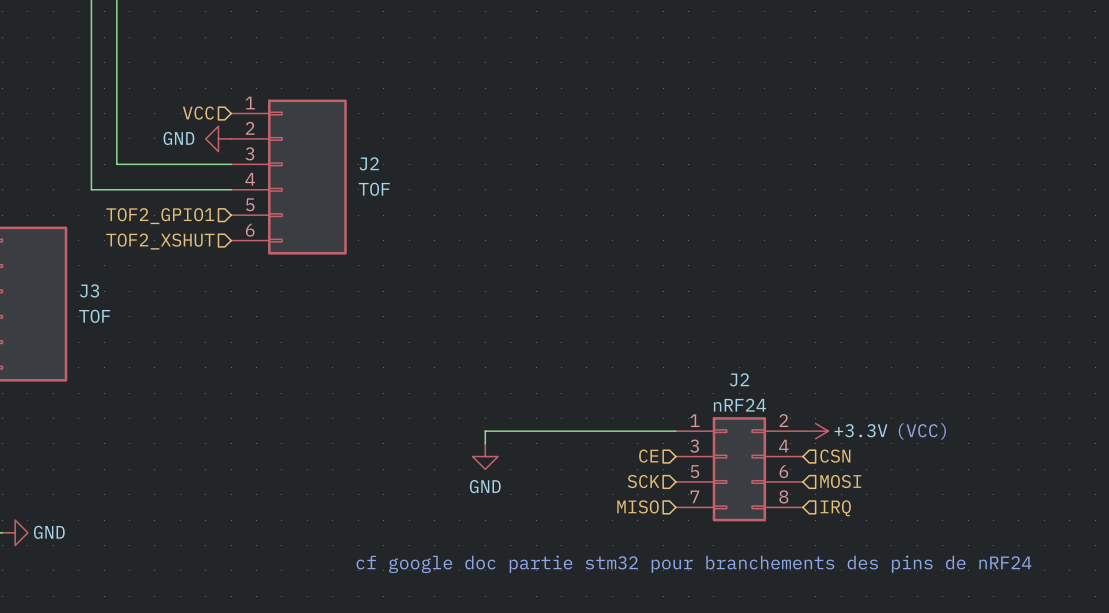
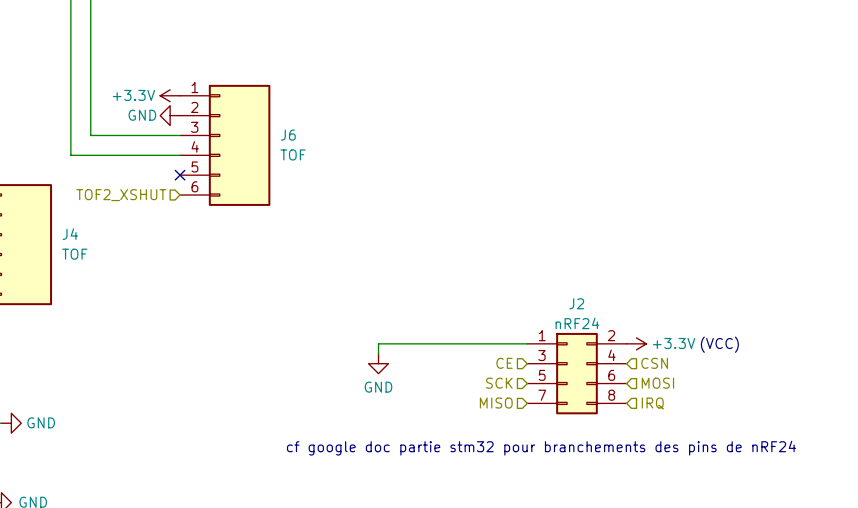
hierarchical label: VCC (198, 113) -> none
power symbol: none -> +3.3V (170, 95)
J2 name: J2 (369, 163) -> J6 (288, 135)
no-connect mark: none -> (180, 175)
hierarchical label: TOF2_GPIO1 (160, 216) -> none
J3 name: J3 (89, 290) -> J4 (70, 234)

